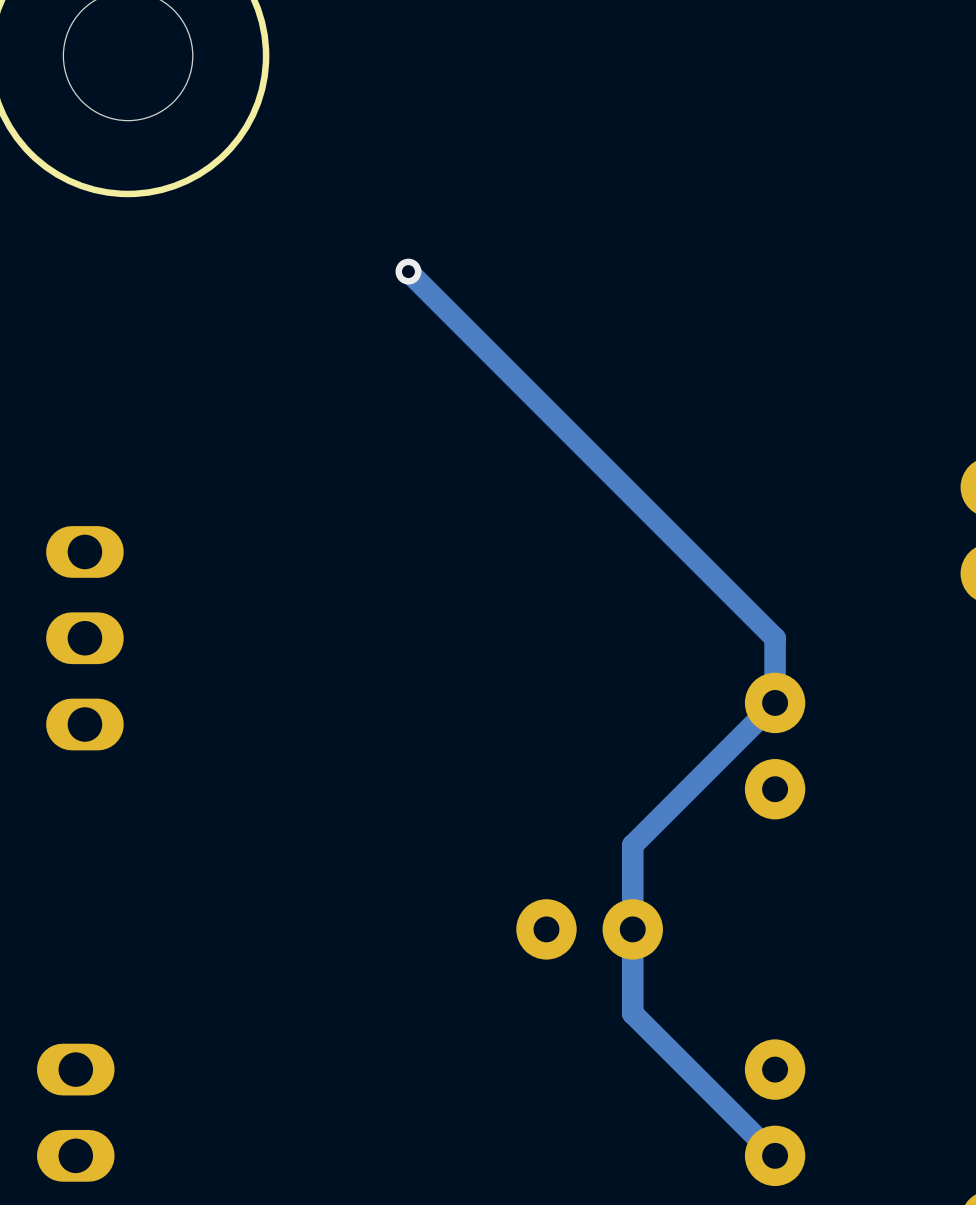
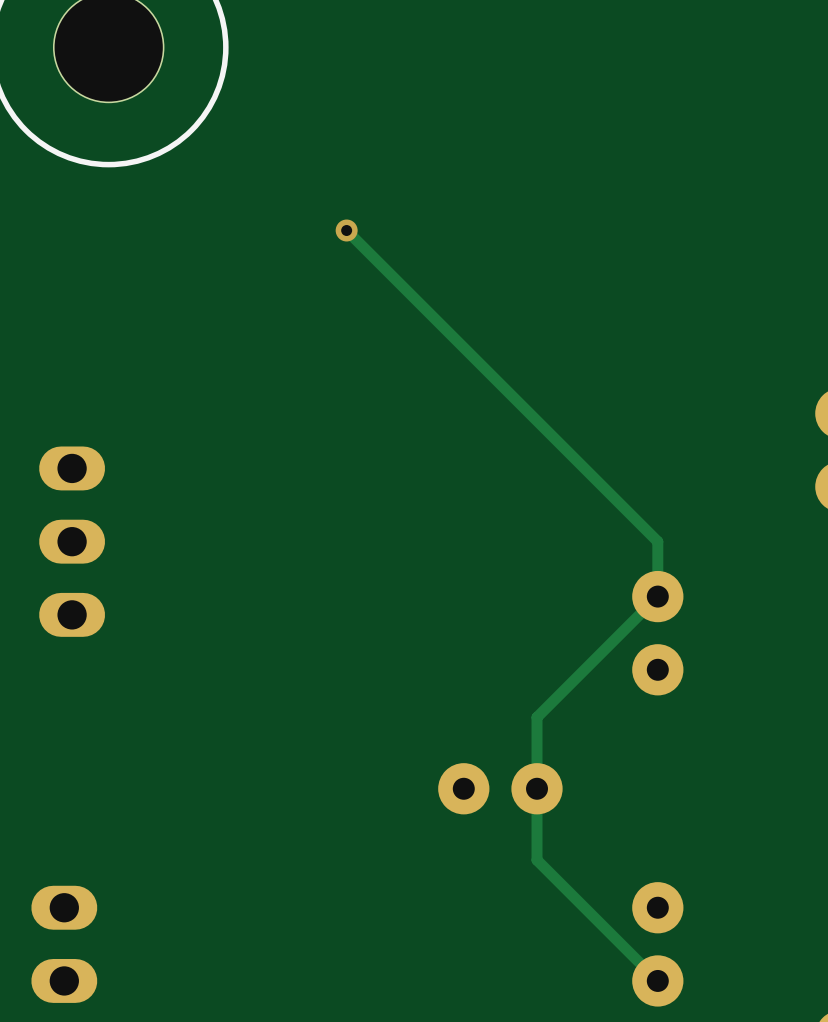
track width: thick (408, 271) (775, 638) (775, 702) (632, 845) (632, 1013) (775, 1155) -> thin (346, 230) (657, 541) (657, 596) (537, 717) (537, 860) (657, 980)

